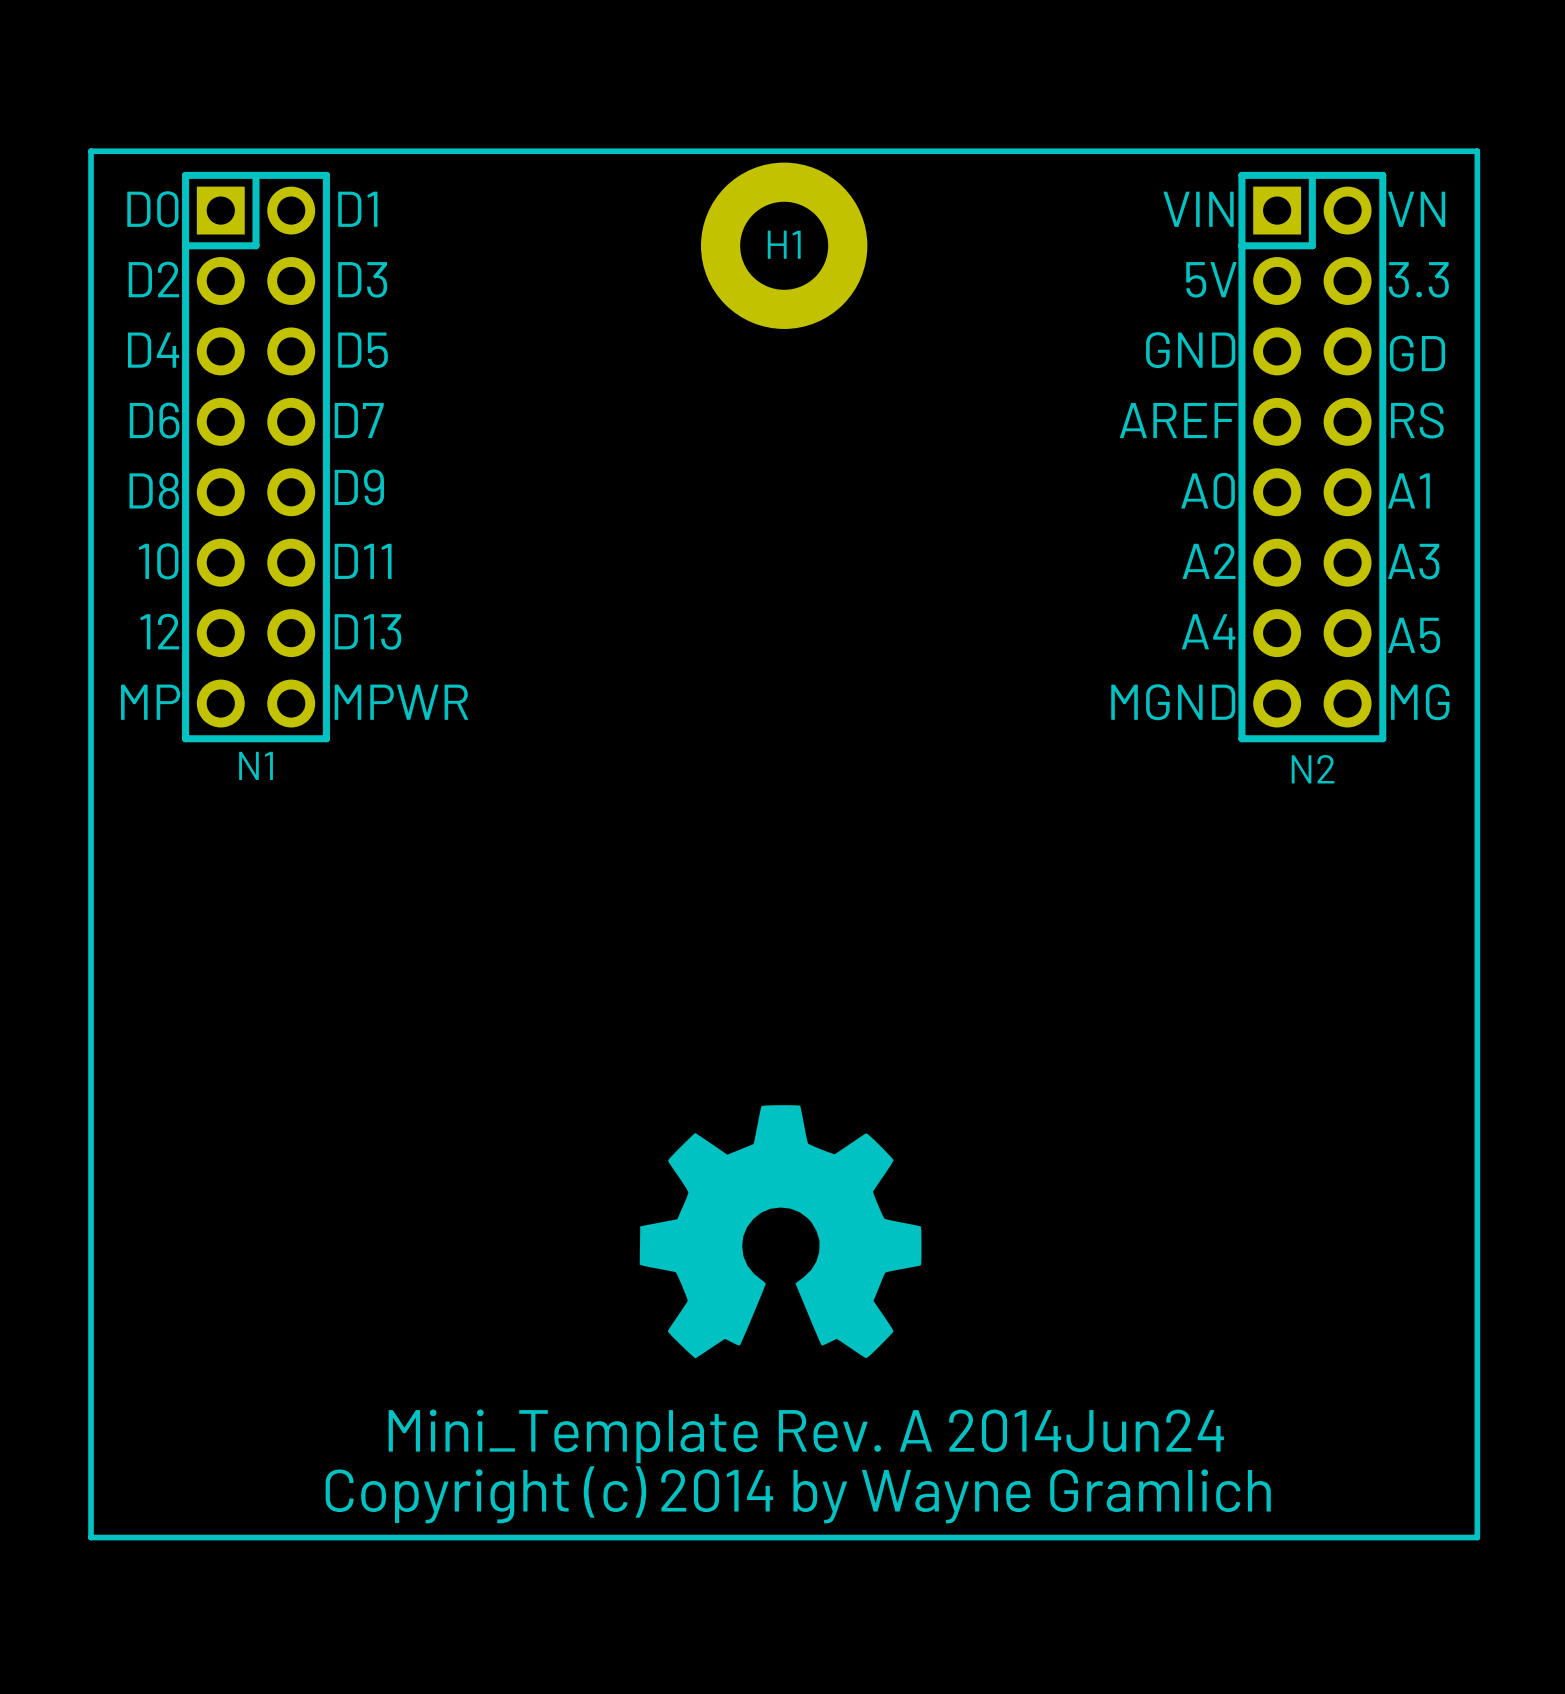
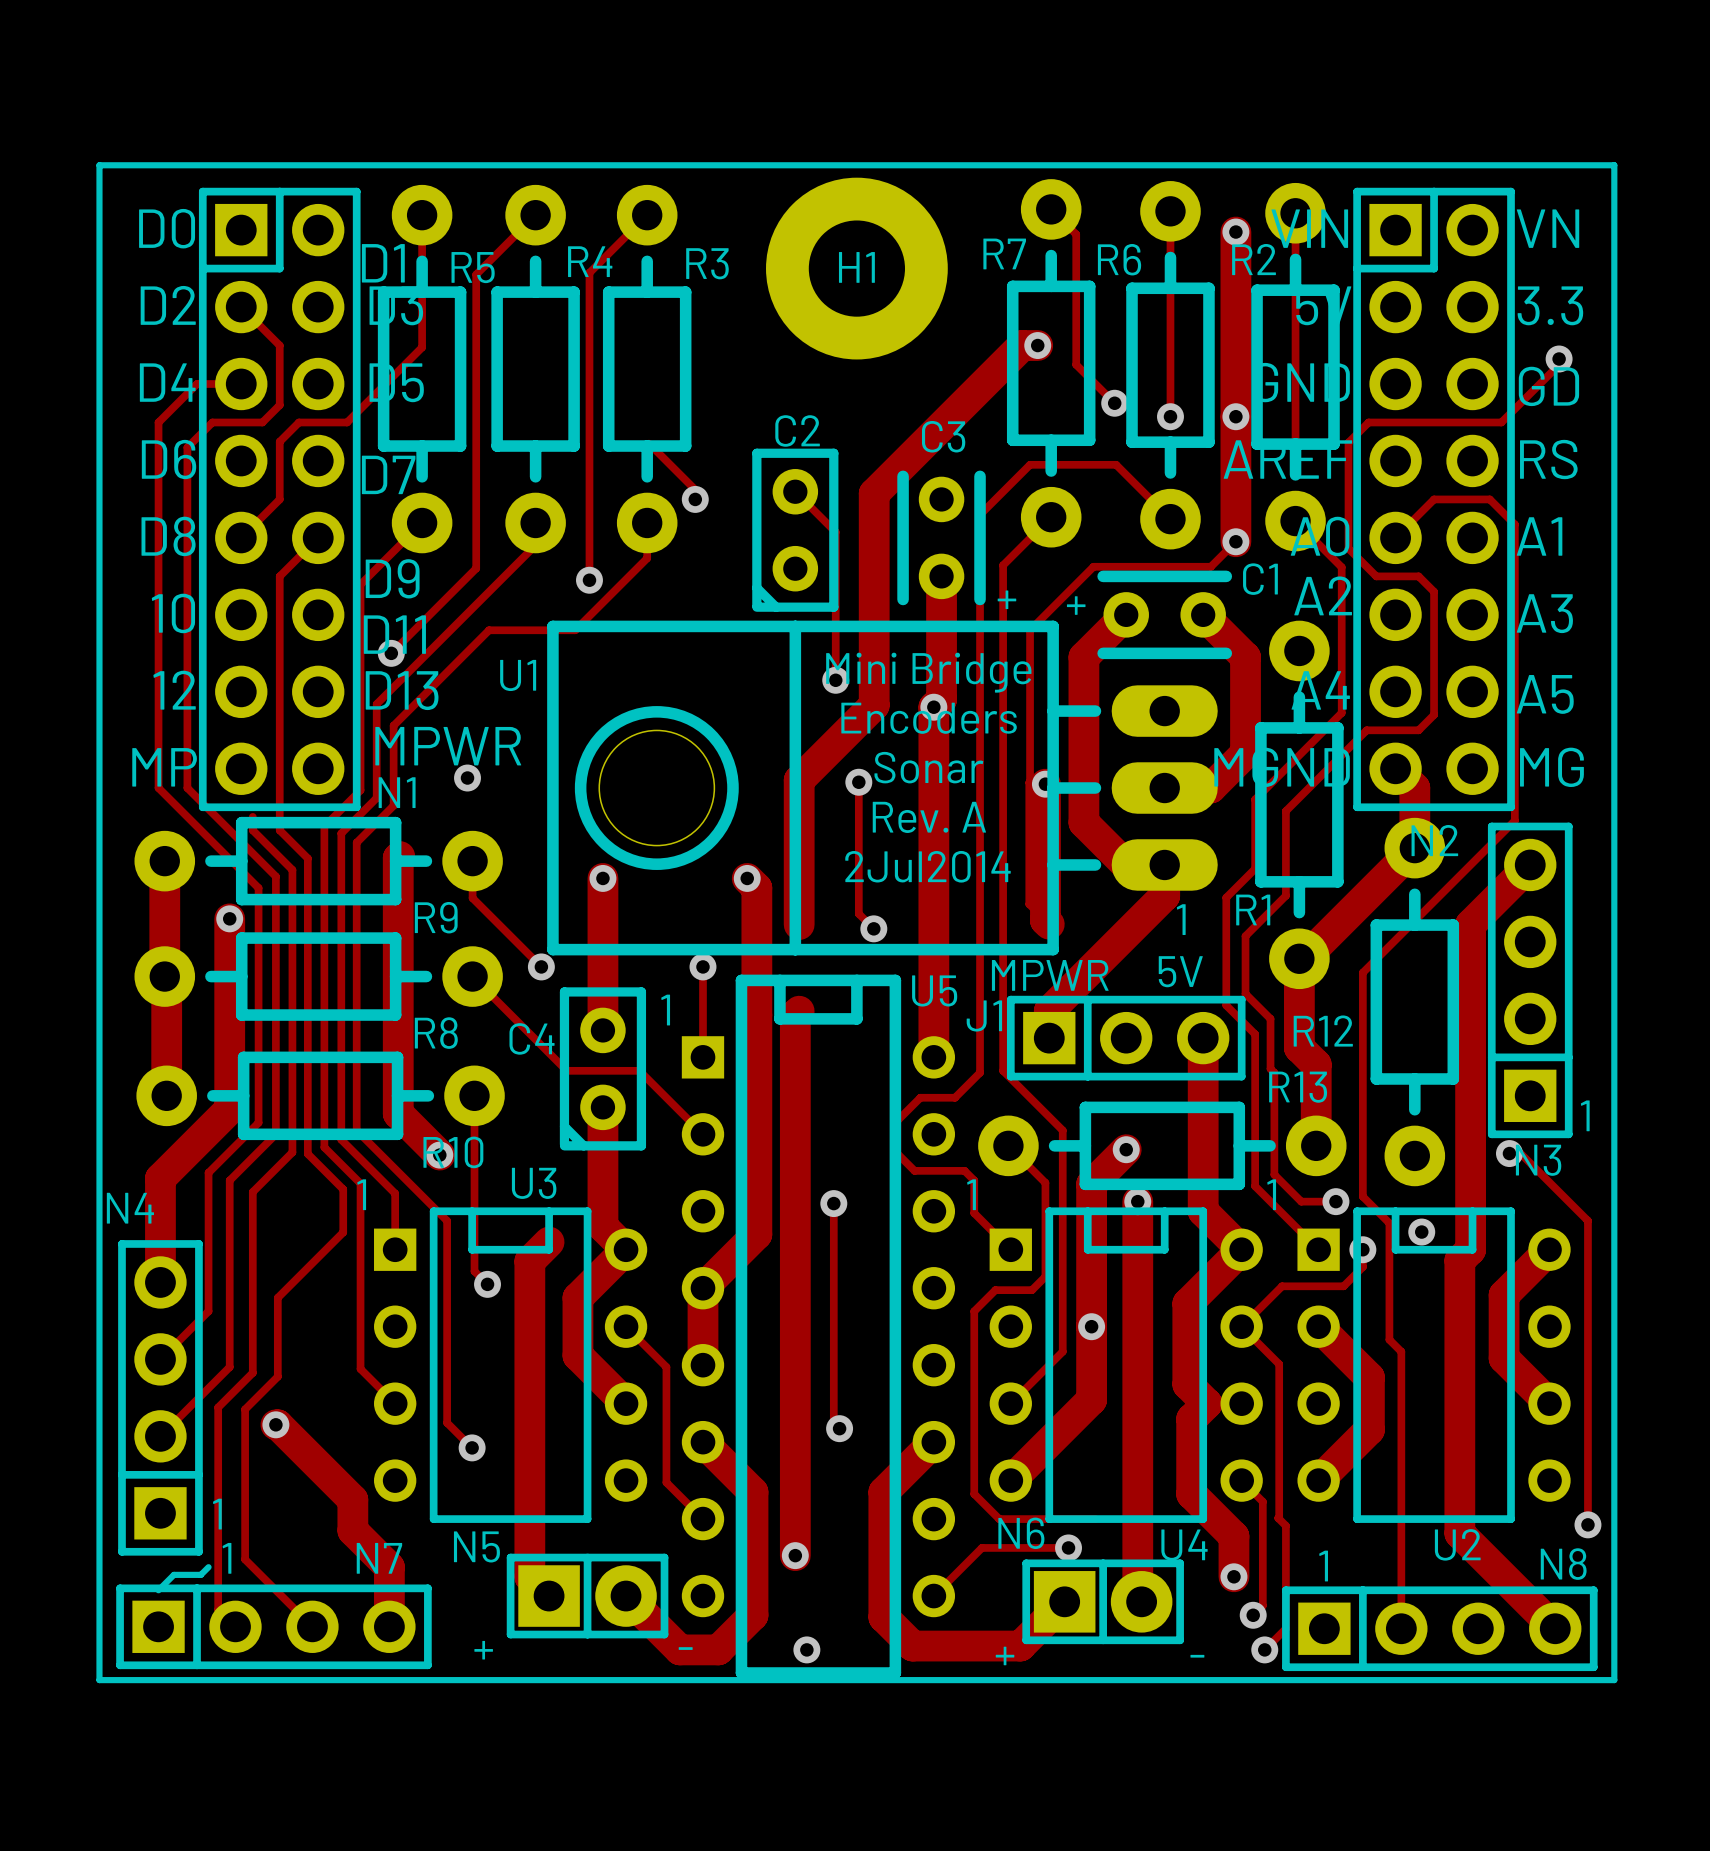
track: none -> (1051, 209) (1076, 234) (1076, 364) (1114, 403)
track: none -> (1170, 211) (1170, 416)
track: none -> (1295, 213) (1295, 462)
track: none -> (422, 215) (422, 347) (347, 422) (298, 422) (279, 441) (279, 499) (241, 537)
track: none -> (535, 215) (476, 274) (476, 568) (391, 653)
track: none -> (647, 215) (589, 272) (589, 580)
text position: D1 (357, 209) -> D1 (383, 263)
track: none -> (1235, 232) (1235, 541) (1210, 566) (1093, 566) (1030, 630) (1029, 904) (1049, 924) (1045, 920) (1045, 784)
via: none -> (1235, 232)
track: none -> (241, 307) (279, 345) (279, 405) (262, 422) (212, 422) (187, 447) (187, 788) (275, 876) (275, 1134) (229, 1180) (229, 1367) (160, 1436)
track: none -> (1037, 345) (1022, 345) (874, 493) (874, 705) (799, 780) (799, 924)
via: none -> (1037, 345)
track: none -> (1559, 359) (1559, 364) (1501, 422) (1368, 422) (1348, 442) (1348, 548) (1376, 576) (1418, 576) (1434, 591) (1434, 714) (1418, 730) (1366, 730) (1285, 811) (1285, 895) (1245, 936) (1245, 993) (1270, 1018) (1270, 1068) (1274, 1072) (1274, 1174) (1301, 1201) (1335, 1201)
via: none -> (1559, 359)
R7: none -> (1051, 363)
R6: none -> (1170, 365)
R2: none -> (1295, 367)
R5: none -> (422, 369)
R4: none -> (535, 369)
R3: none -> (647, 369)
track: none -> (241, 384) (197, 384) (158, 422) (158, 788) (258, 888) (258, 1122) (208, 1172) (208, 1311) (160, 1359)
via: none -> (1114, 403)
via: none -> (1170, 416)
via: none -> (1235, 416)
track: none -> (649, 443) (695, 489) (695, 499)
text position: D7 (359, 420) -> D7 (388, 474)
track: none -> (795, 491) (835, 532) (835, 680)
via: none -> (695, 499)
track: none -> (1051, 517) (1003, 565) (1003, 1070) (1062, 1130) (1062, 1351) (1010, 1403)
track: none -> (1170, 519) (1116, 464) (1030, 464) (980, 514) (980, 1072) (955, 1097) (920, 1097) (897, 1120) (897, 1153) (914, 1170) (964, 1170) (974, 1180) (974, 1213) (1010, 1249)
track: none -> (1295, 521) (1341, 567) (1341, 712) (1255, 799) (1255, 868) (1226, 897) (1226, 1005) (1255, 1034) (1255, 1186) (1318, 1249)
track: none -> (422, 522) (360, 584) (360, 790) (324, 826) (324, 1147) (360, 1183) (360, 1369) (395, 1403) (412, 1403)
track: none -> (535, 522) (535, 545) (376, 704) (376, 798) (341, 833) (341, 1139) (395, 1193) (395, 1249)
track: none -> (647, 522) (647, 558) (575, 630) (489, 630) (393, 725) (393, 805) (356, 842) (356, 1130) (447, 1220) (447, 1422) (472, 1447)
C2: none -> (795, 530)
text position: D9 (359, 487) -> D9 (392, 578)
track: none -> (318, 537) (279, 576) (279, 830) (307, 858) (307, 1153) (343, 1189) (343, 1232) (277, 1297) (277, 1376) (245, 1409) (245, 1559) (312, 1626)
C3: none -> (941, 537)
track: none -> (1395, 537) (1434, 499) (1489, 499) (1514, 524) (1514, 820) (1362, 972) (1362, 1196) (1389, 1223) (1389, 1339) (1401, 1351) (1401, 1628)
via: none -> (1235, 541)
track: none -> (941, 576) (941, 699) (933, 707) (933, 1057)
via: none -> (589, 580)
text: none -> + (1006, 599)
text: none -> + (1076, 605)
text position: D11 (363, 561) -> D11 (394, 634)
text position: A2 (1209, 561) -> A2 (1323, 595)
track: none -> (1126, 614) (1083, 657) (1083, 822) (1126, 864) (1164, 864) (1164, 895) (1049, 1011) (1049, 1038)
C1: none -> (1164, 614)
track: none -> (1203, 614) (1245, 657) (1245, 753) (1210, 788) (1164, 788)
via: none -> (391, 653)
text: none -> Mini Bridge (928, 672)
via: none -> (835, 680)
via: none -> (933, 707)
text: none -> Encoders (929, 718)
text position: MPWR (401, 702) -> MPWR (448, 746)
text: none -> Sonar (928, 767)
track: none -> (1395, 768) (1414, 788) (1414, 848) (1304, 958) (1299, 958) (1299, 1047) (1316, 1064) (1316, 1145)
via: none -> (467, 778)
track: none -> (858, 782) (858, 913) (873, 928)
via: none -> (858, 782)
via: none -> (1045, 784)
U1: none -> (882, 788)
R1: none -> (1299, 804)
track: none -> (252, 816) (252, 830) (292, 869) (292, 1152) (252, 1192) (252, 1372) (218, 1407) (218, 1609) (235, 1626)
text: none -> Rev. A (929, 817)
N1 name position: N1 (256, 765) -> N1 (397, 792)
track: none -> (399, 856) (398, 858) (398, 1113) (439, 1155)
track: none -> (164, 861) (166, 1095)
R9: none -> (318, 861)
track: none -> (472, 861) (472, 898) (541, 966)
track: none -> (1530, 864) (1470, 924) (1470, 1249) (1459, 1260) (1459, 1533) (1555, 1628)
text: none -> 2Jul2014 (927, 866)
track: none -> (602, 878) (602, 1030)
via: none -> (602, 878)
track: none -> (747, 878) (756, 888) (756, 1234) (702, 1288) (702, 1365)
via: none -> (747, 878)
track: none -> (229, 918) (229, 1109) (160, 1178) (160, 1282)
via: none -> (229, 918)
text: none -> 1 (1181, 919)
via: none -> (873, 928)
via: none -> (541, 966)
track: none -> (702, 966) (702, 1057)
via: none -> (702, 966)
text: none -> 5V (1180, 971)
text: none -> MPWR (1050, 975)
R8: none -> (318, 976)
track: none -> (472, 976) (566, 1070) (639, 1070) (702, 1134)
N3: none -> (1530, 980)
R12: none -> (1414, 1002)
text: none -> 1 (665, 1010)
track: none -> (799, 1011) (795, 1015) (795, 1555)
J1: none -> (1126, 1038)
track: none -> (1203, 1038) (1203, 1211) (1241, 1249) (1187, 1303) (1187, 1384) (1207, 1403) (1191, 1419) (1191, 1494) (1233, 1536) (1233, 1576)
C4: none -> (602, 1068)
R10: none -> (320, 1095)
track: none -> (474, 1095) (474, 1271) (487, 1284)
track: none -> (602, 1107) (602, 1226) (626, 1249) (577, 1297) (577, 1355) (626, 1403)
text: none -> 1 (1585, 1115)
track: none -> (1008, 1145) (1045, 1182) (1045, 1276) (1031, 1290) (995, 1290) (974, 1311) (974, 1494) (999, 1519) (1095, 1519)
R13: none -> (1162, 1145)
track: none -> (1126, 1149) (1091, 1184) (1091, 1399) (1010, 1480)
via: none -> (1126, 1149)
track: none -> (1509, 1153) (1520, 1153) (1587, 1220) (1587, 1524)
via: none -> (1509, 1153)
via: none -> (439, 1155)
text: none -> 1 (361, 1194)
text: none -> 1 (971, 1194)
text: none -> 1 (1271, 1194)
track: none -> (1137, 1201) (1137, 1597) (1141, 1601)
via: none -> (1137, 1201)
via: none -> (1335, 1201)
track: none -> (833, 1203) (833, 1422) (839, 1428)
via: none -> (833, 1203)
drawing: [639, 1105, 922, 1359] -> none
via: none -> (1421, 1232)
track: none -> (549, 1242) (529, 1261) (529, 1576) (549, 1596)
track: none -> (1362, 1249) (1362, 1267) (1343, 1286) (1282, 1286) (1241, 1326) (1279, 1364) (1278, 1518) (1285, 1525) (1285, 1628) (1264, 1649)
via: none -> (1362, 1249)
track: none -> (1549, 1249) (1504, 1295) (1504, 1358) (1549, 1403)
via: none -> (487, 1284)
track: none -> (626, 1326) (666, 1367) (666, 1482) (702, 1519)
U5: none -> (818, 1326)
via: none -> (1091, 1326)
track: none -> (1318, 1326) (1369, 1377) (1369, 1429) (1318, 1480)
U3: none -> (510, 1365)
U4: none -> (1126, 1365)
U2: none -> (1434, 1365)
N4: none -> (160, 1397)
track: none -> (275, 1424) (352, 1499) (352, 1530) (389, 1567) (389, 1626)
via: none -> (275, 1424)
via: none -> (839, 1428)
track: none -> (702, 1442) (753, 1492) (753, 1615) (718, 1649) (679, 1649) (626, 1596)
track: none -> (933, 1442) (883, 1492) (883, 1617) (912, 1646) (1020, 1646) (1064, 1601)
via: none -> (472, 1447)
track: none -> (1241, 1480) (1262, 1501) (1262, 1605) (1253, 1615)
text: none -> 1 (217, 1514)
via: none -> (1587, 1524)
track: none -> (1068, 1547) (981, 1547) (933, 1596)
via: none -> (1068, 1547)
via: none -> (795, 1555)
text: none -> 1 (227, 1558)
text: none -> 1 (1323, 1566)
line: none -> (208, 1567) (200, 1574) (173, 1574) (158, 1590)
text: Mini_Template Rev. A 2014Jun24 (806, 1436) -> none
via: none -> (1233, 1576)
N5: none -> (587, 1596)
N6: none -> (1103, 1601)
via: none -> (1253, 1615)
N7: none -> (273, 1626)
N8: none -> (1439, 1628)
text: Copyright (c) 2014 by Wayne Gramlich (798, 1494) -> none
text: none -> - (685, 1648)
via: none -> (806, 1649)
via: none -> (1264, 1649)
text: none -> + (483, 1650)
text: none -> + (1005, 1655)
text: none -> - (1197, 1656)

